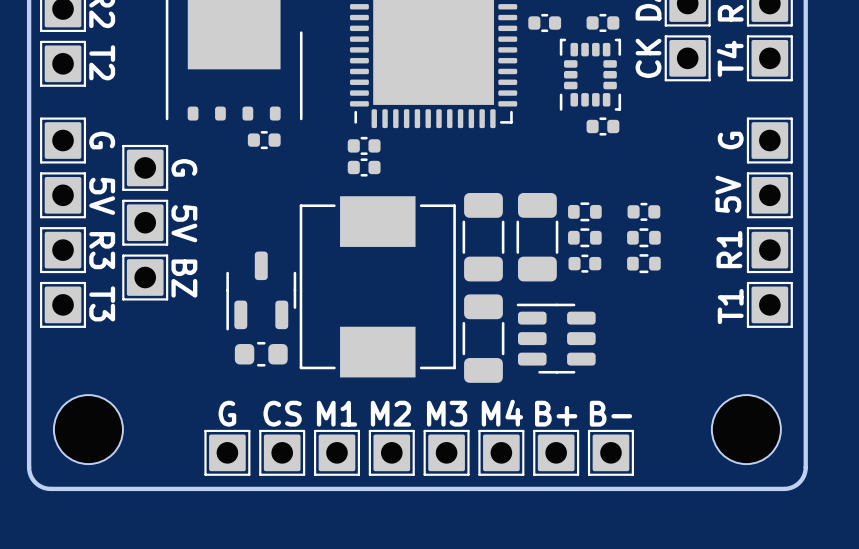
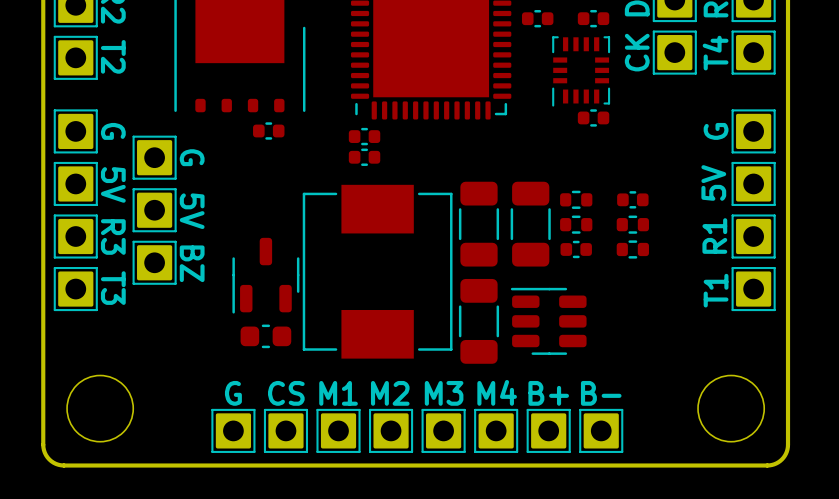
part footprint: [559, 38, 622, 111] -> [552, 36, 611, 107]

